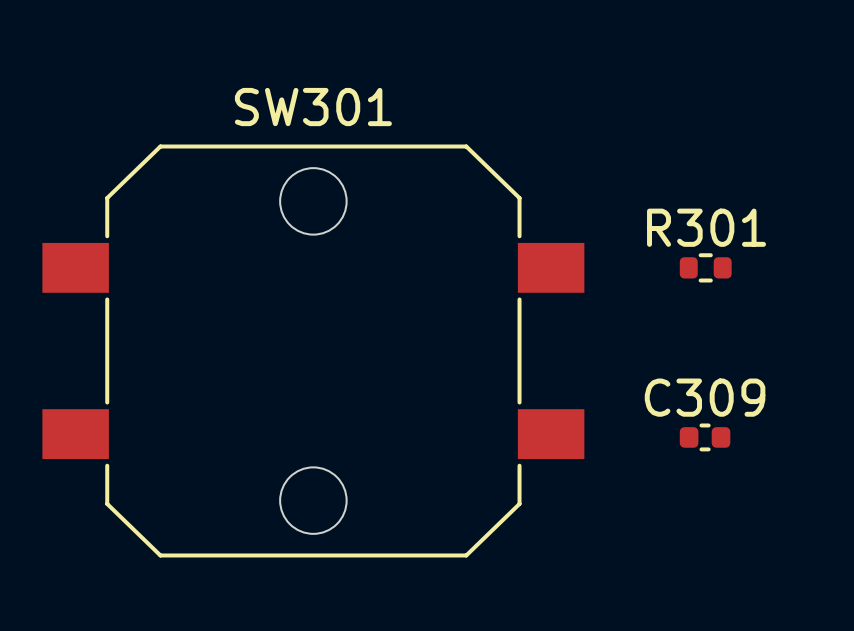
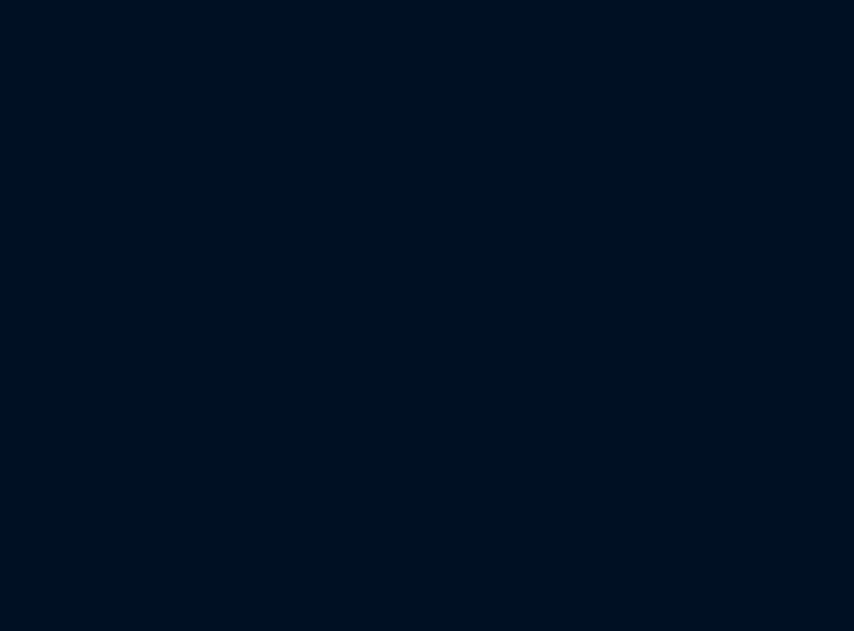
R301: (705, 267) -> none
SW301: (313, 350) -> none
C309: (705, 437) -> none

